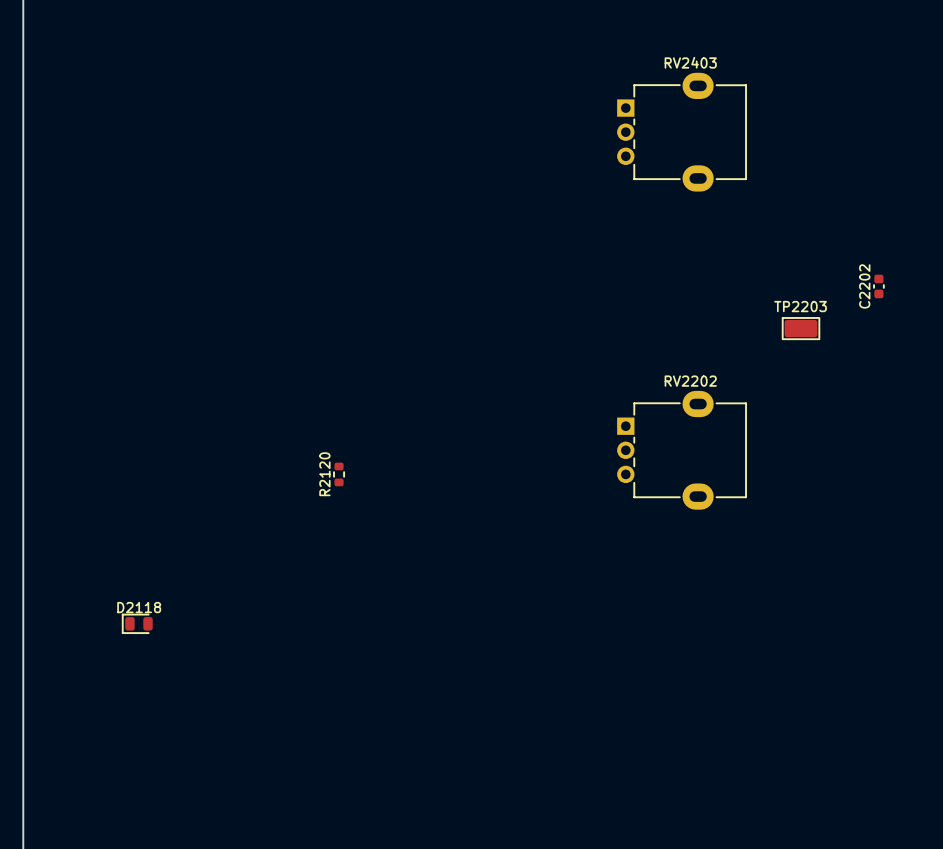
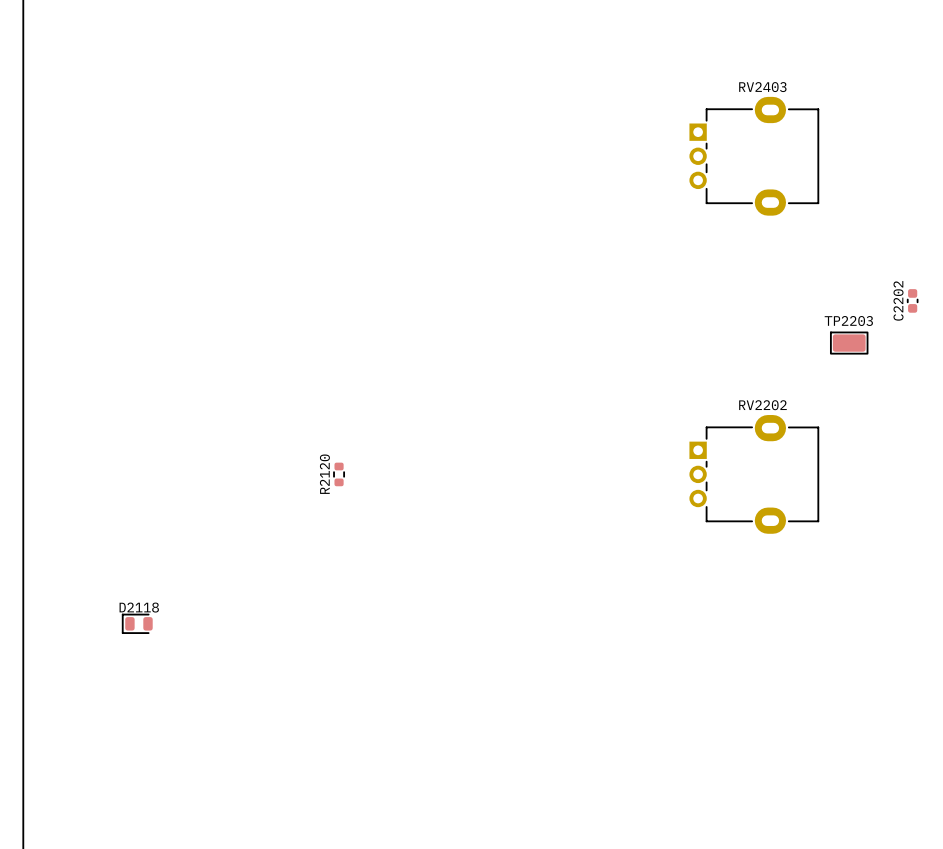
RV2403 position: (681, 132) -> (754, 156)
C2202 position: (878, 286) -> (912, 300)
TP2203 position: (801, 328) -> (849, 343)
RV2202 position: (681, 450) -> (754, 474)

